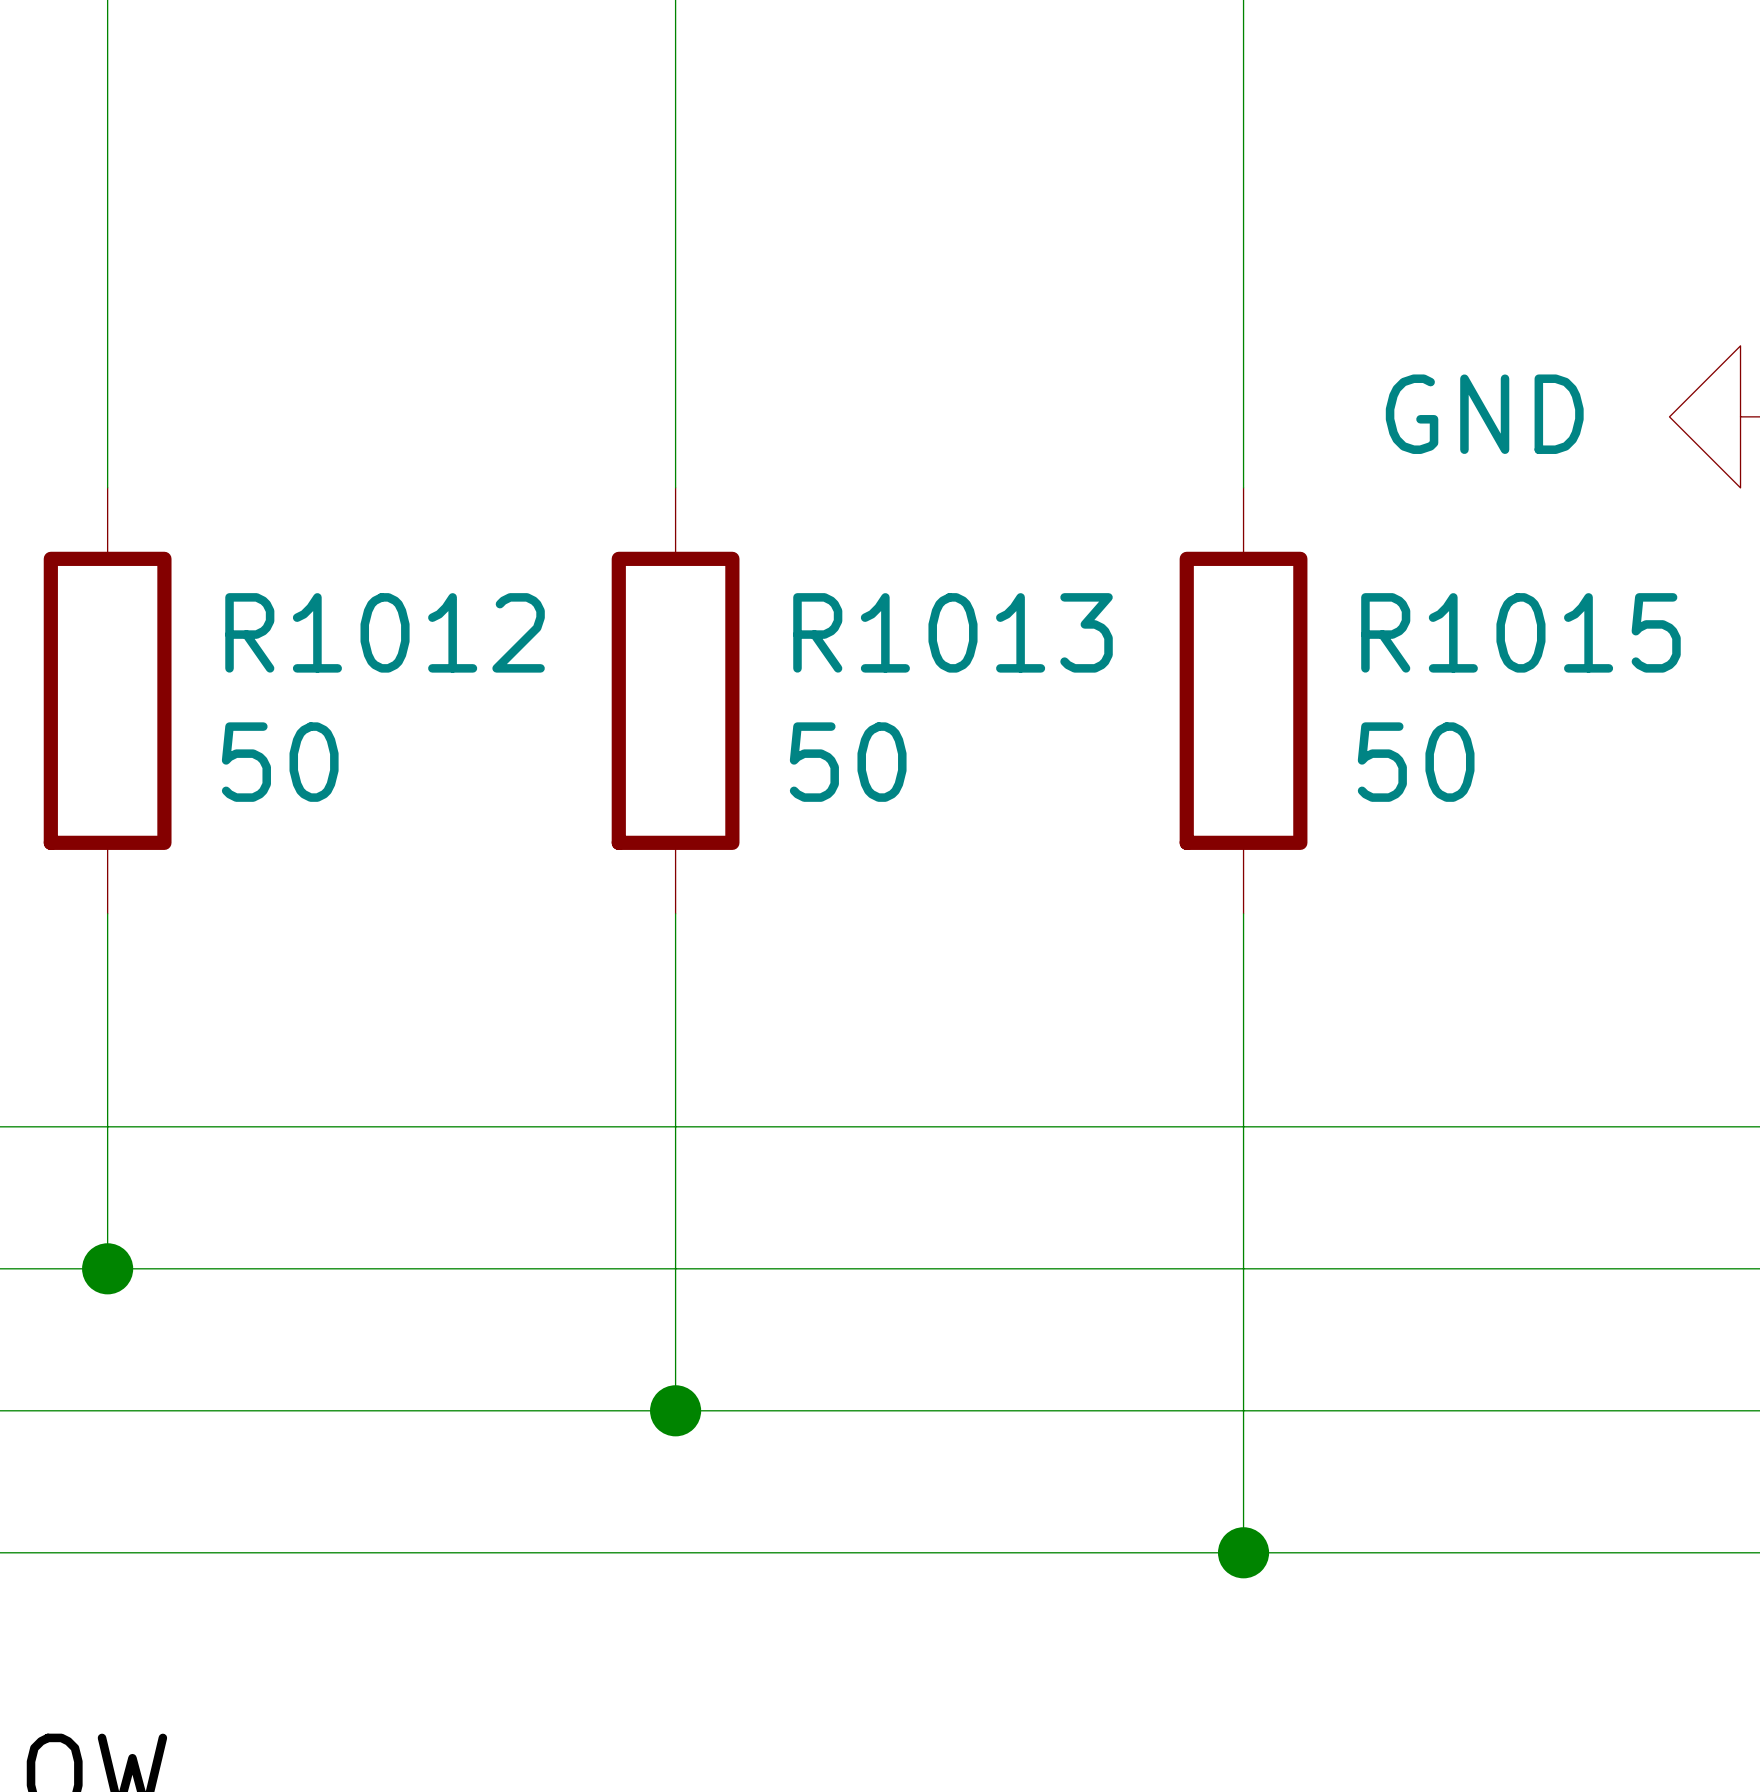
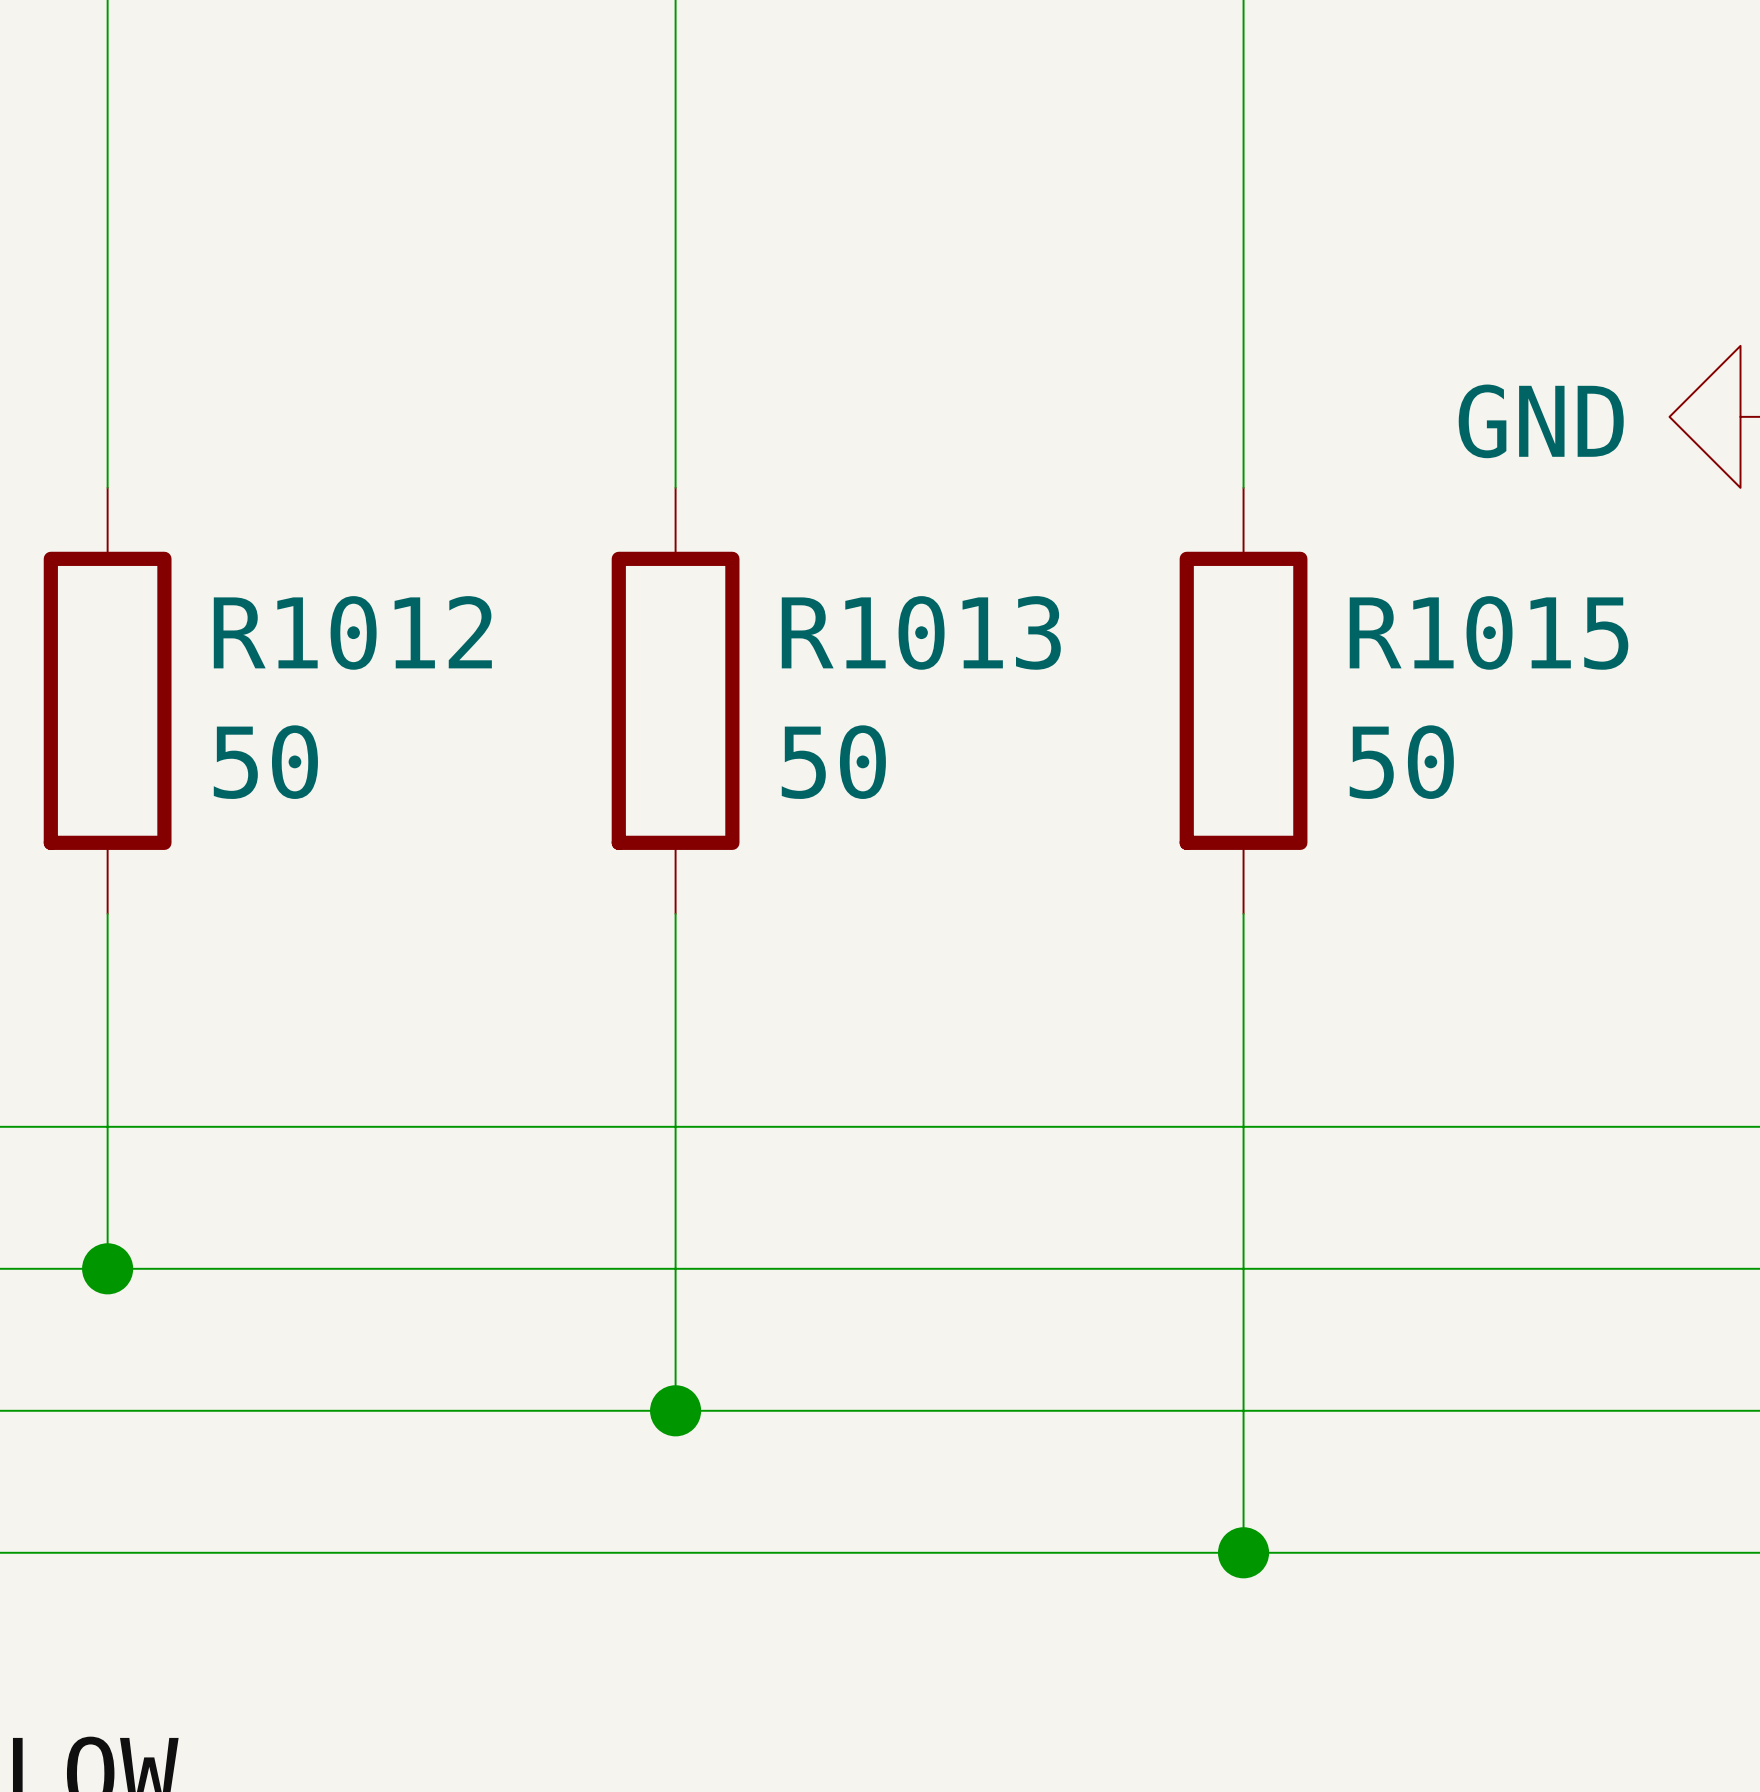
power symbol text position: GND (1484, 414) -> GND (1541, 421)

